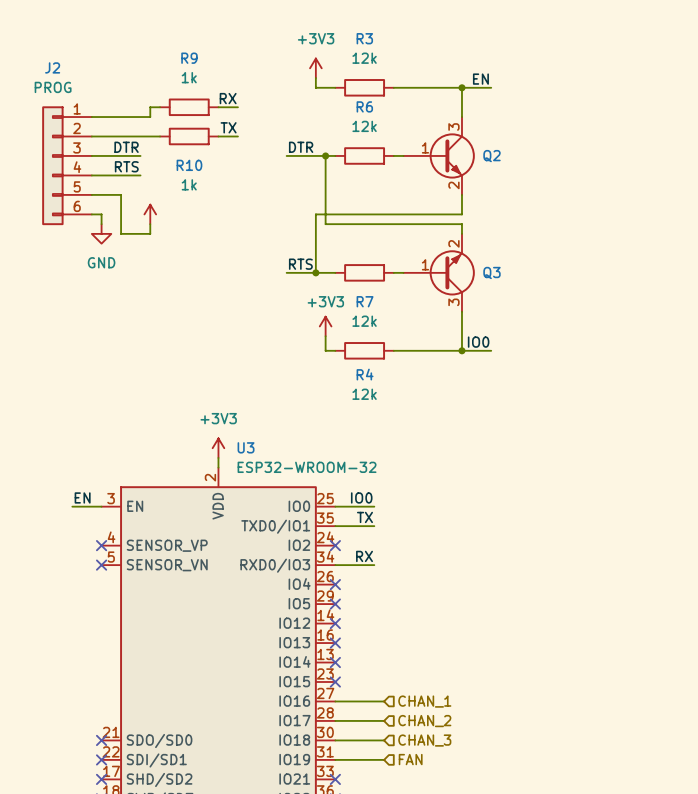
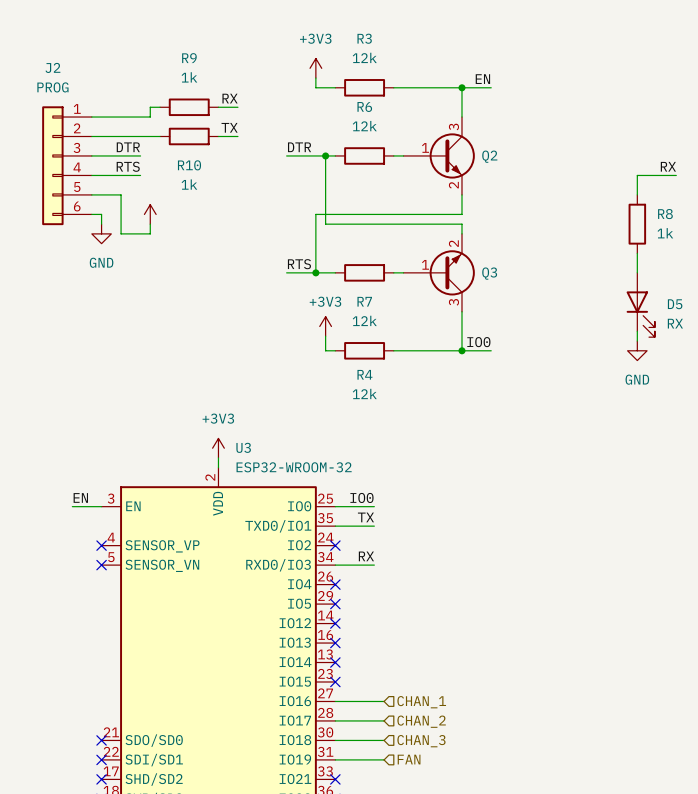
label: none -> RX (668, 166)
wire: none -> (676, 175) (637, 175) (637, 194)
R8: none -> 1k (637, 224)
wire: none -> (637, 253) (637, 272)
D5: none -> RX (640, 305)
wire: none -> (637, 331) (637, 341)
power symbol: none -> GND (637, 350)

